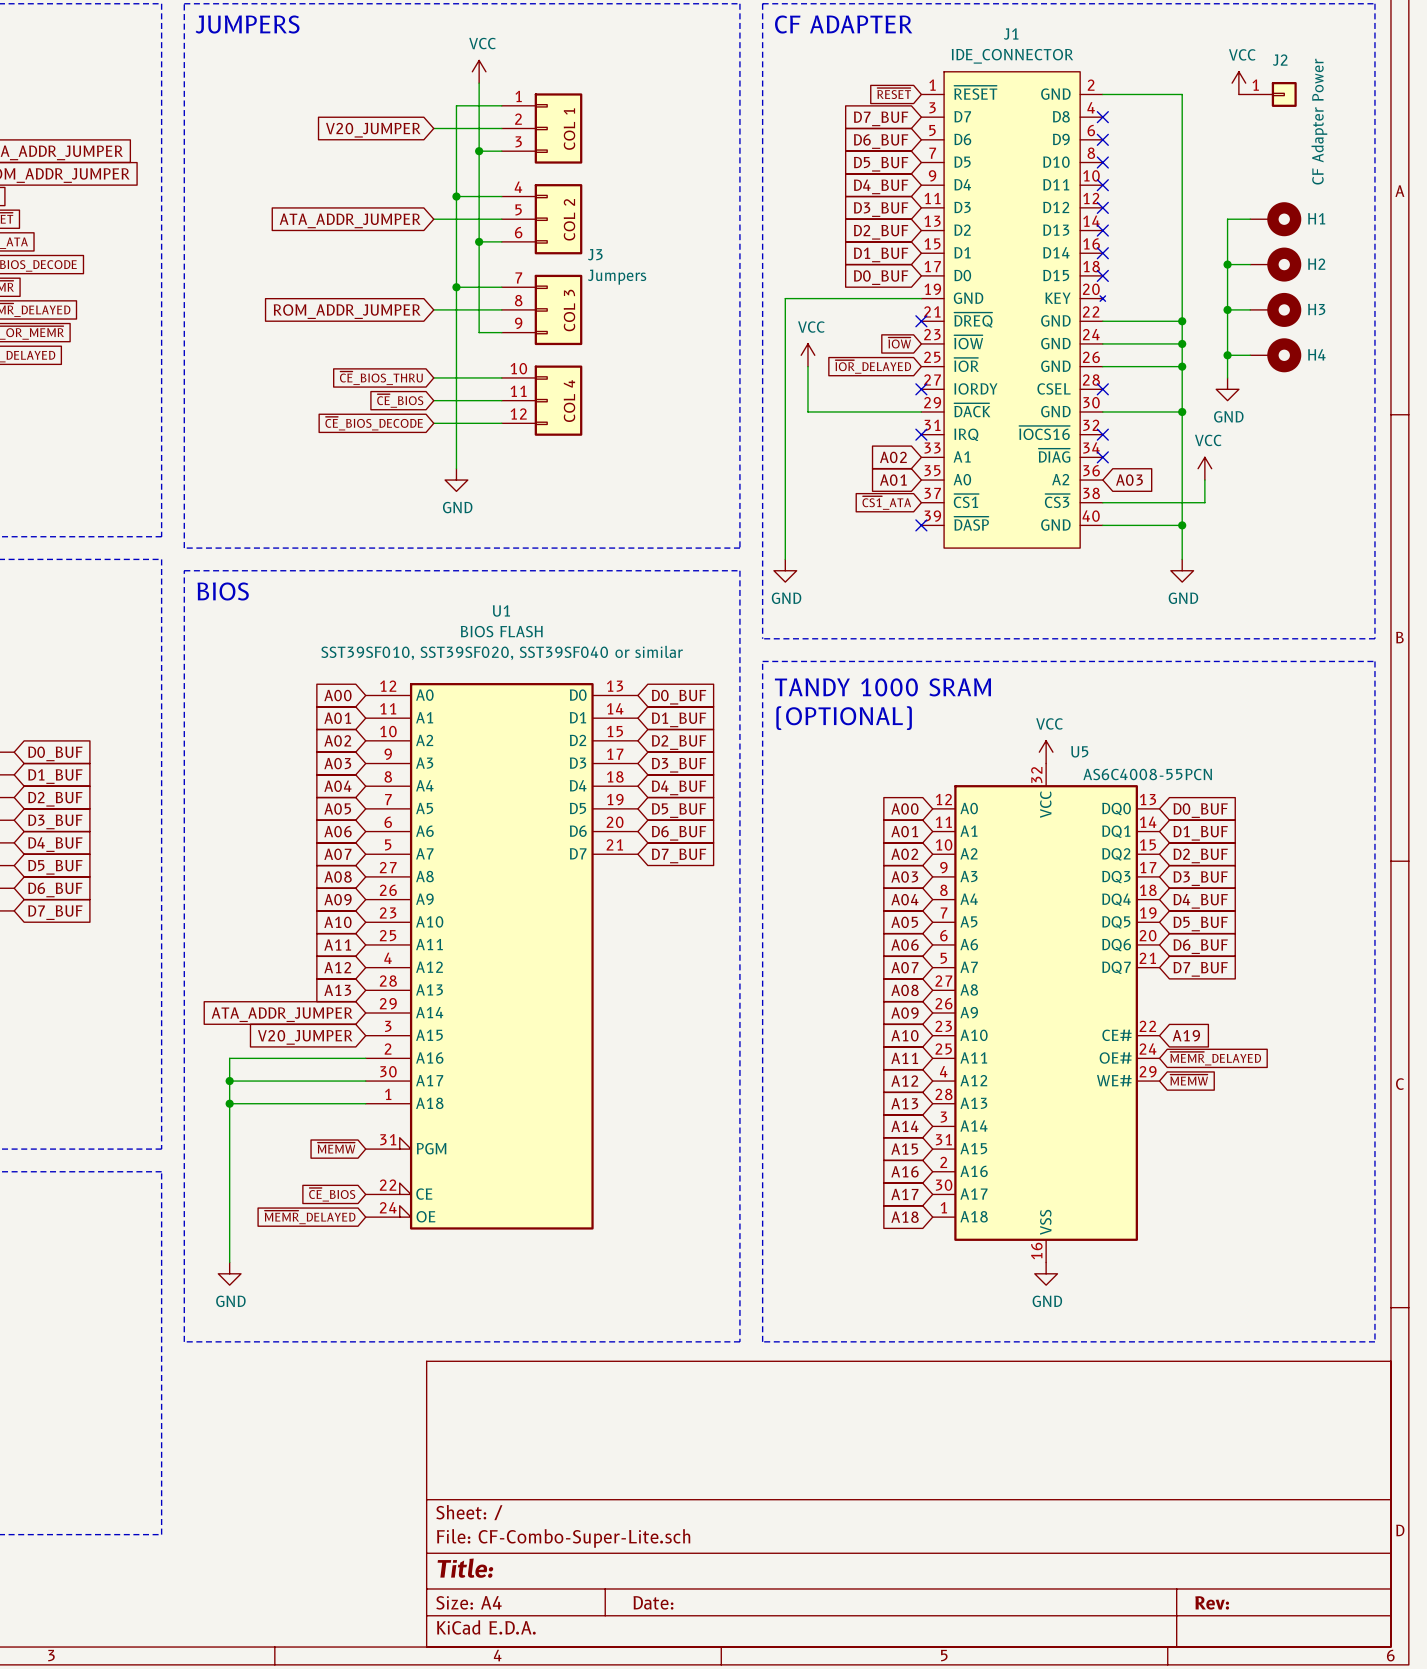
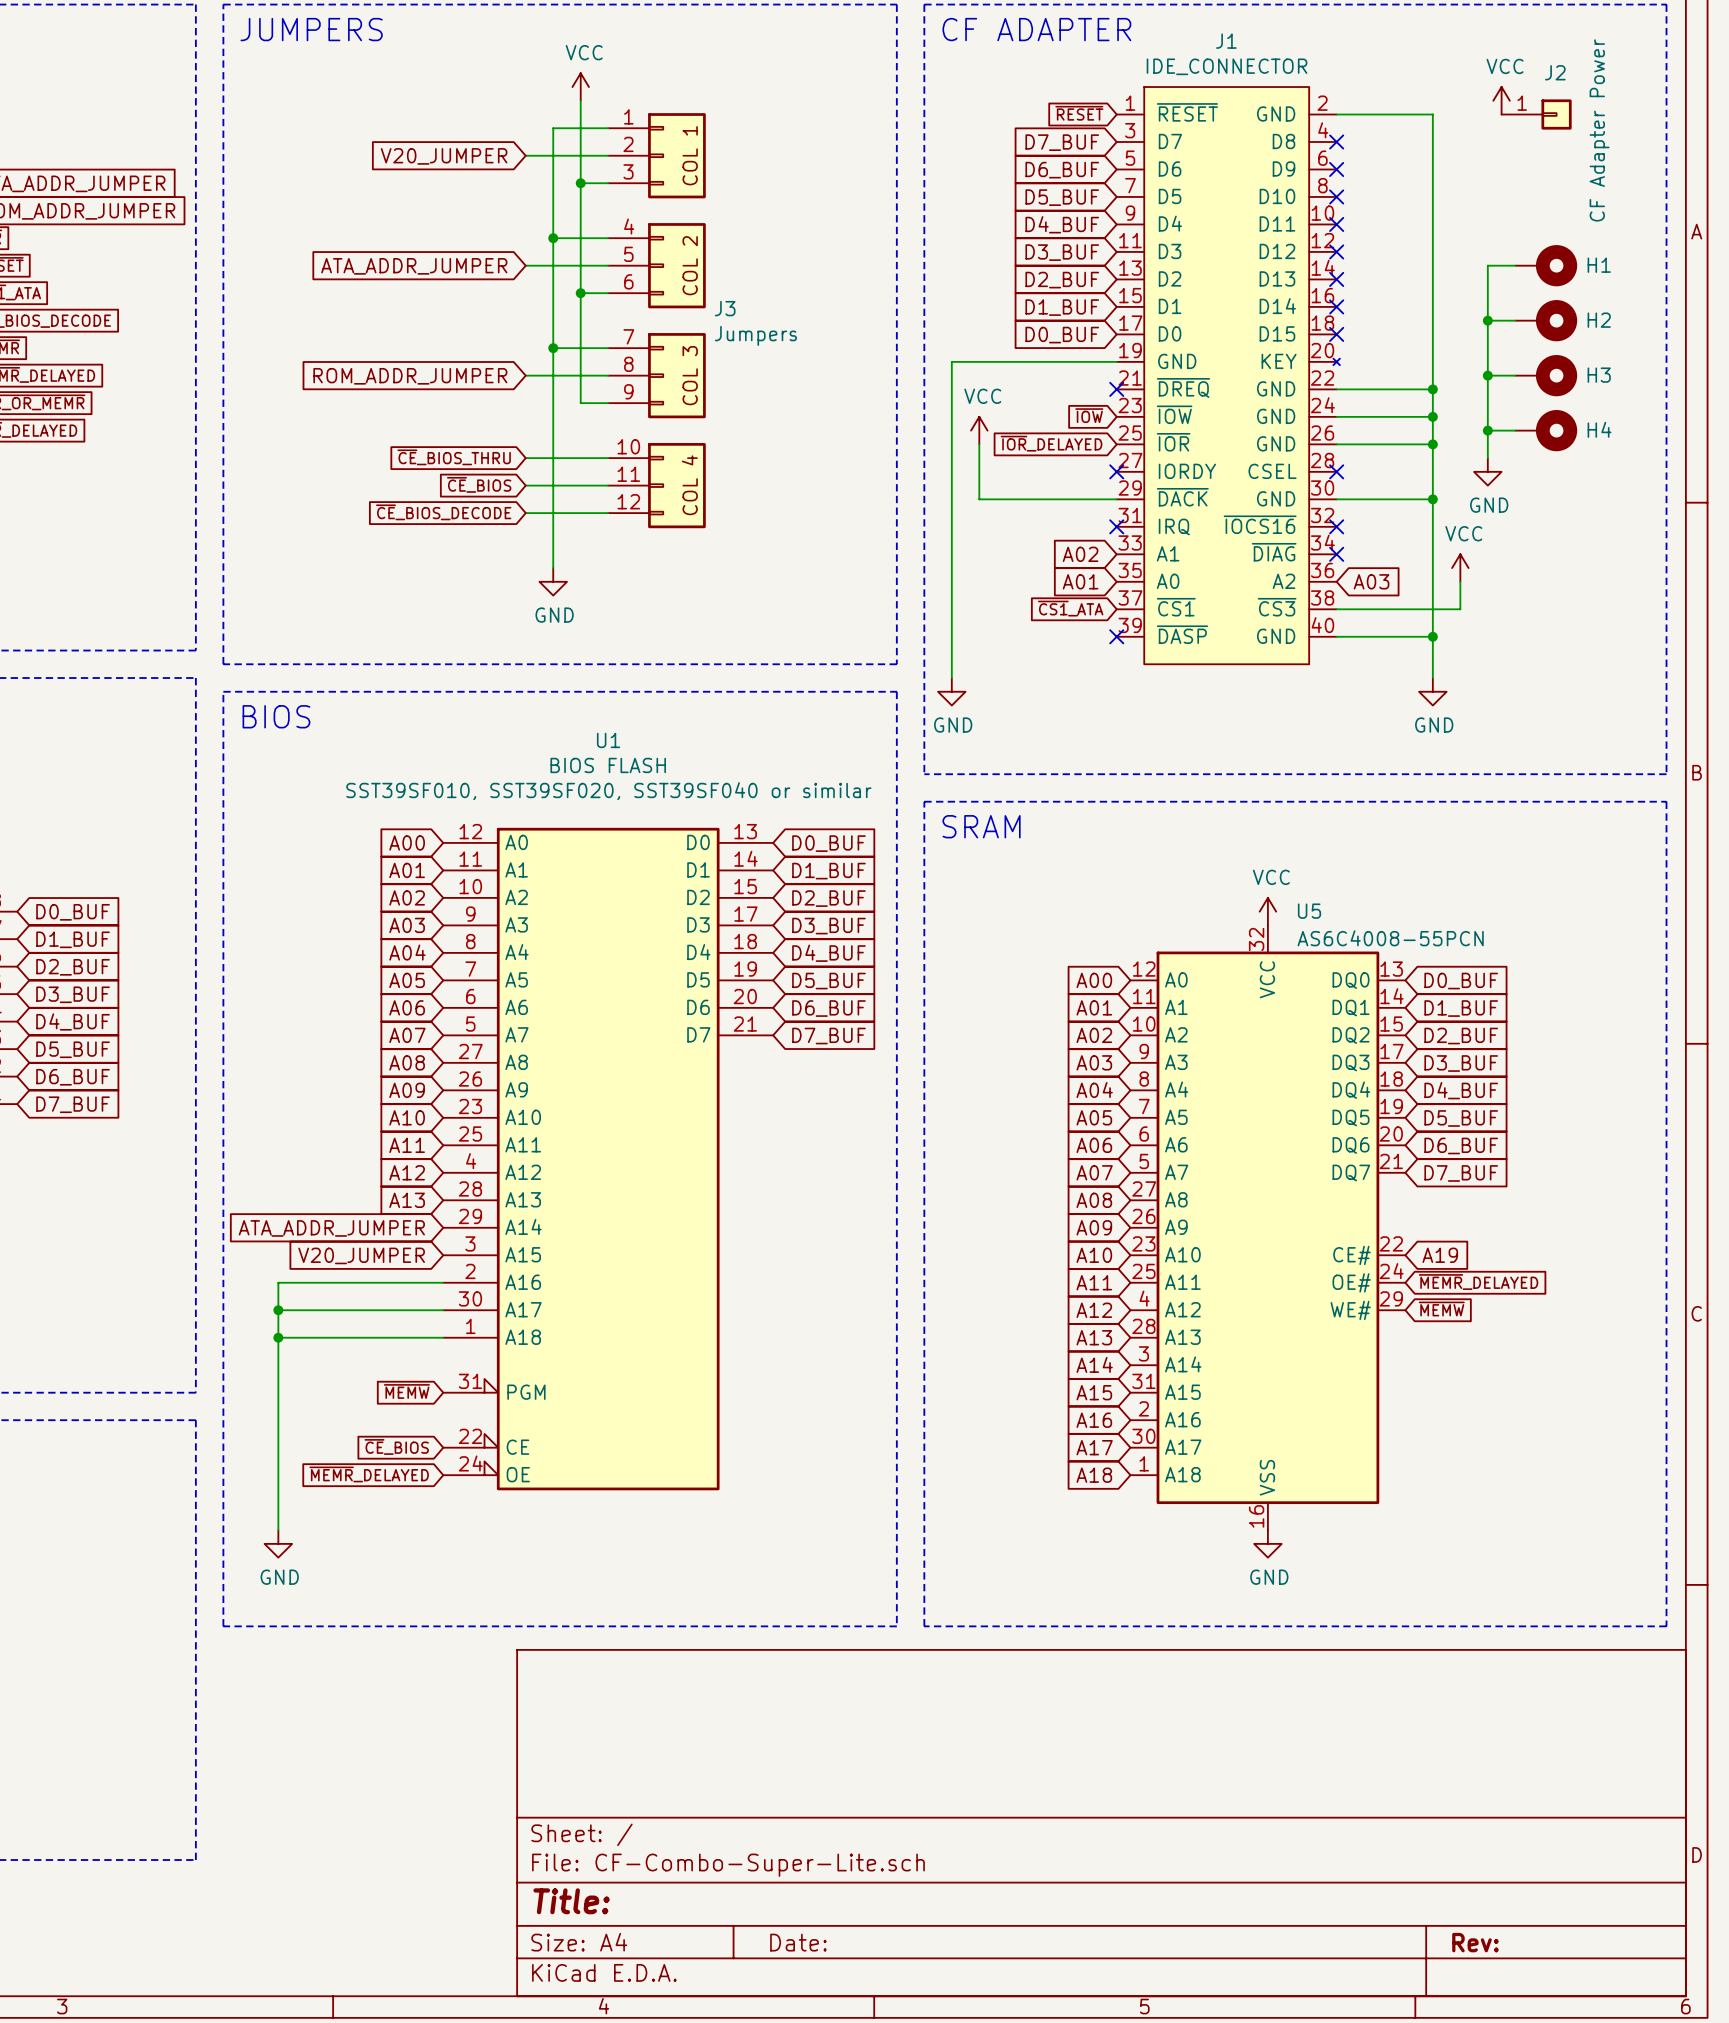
text: TANDY 1000 SRAM (882, 687) -> SRAM (981, 826)
text: (OPTIONAL) (844, 718) -> none

